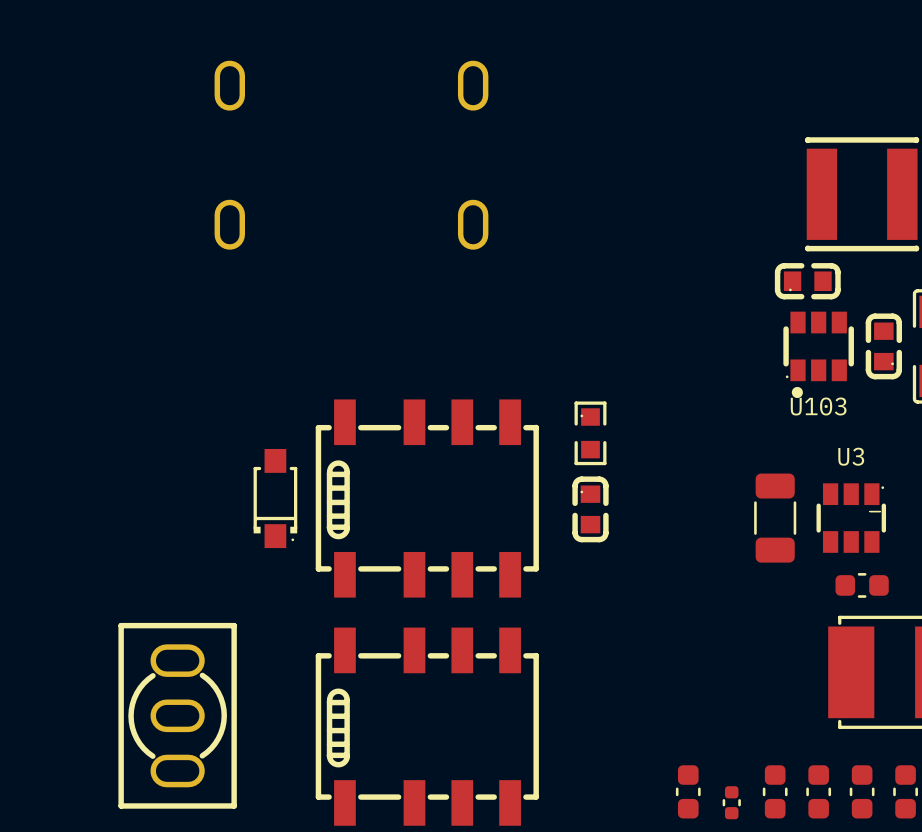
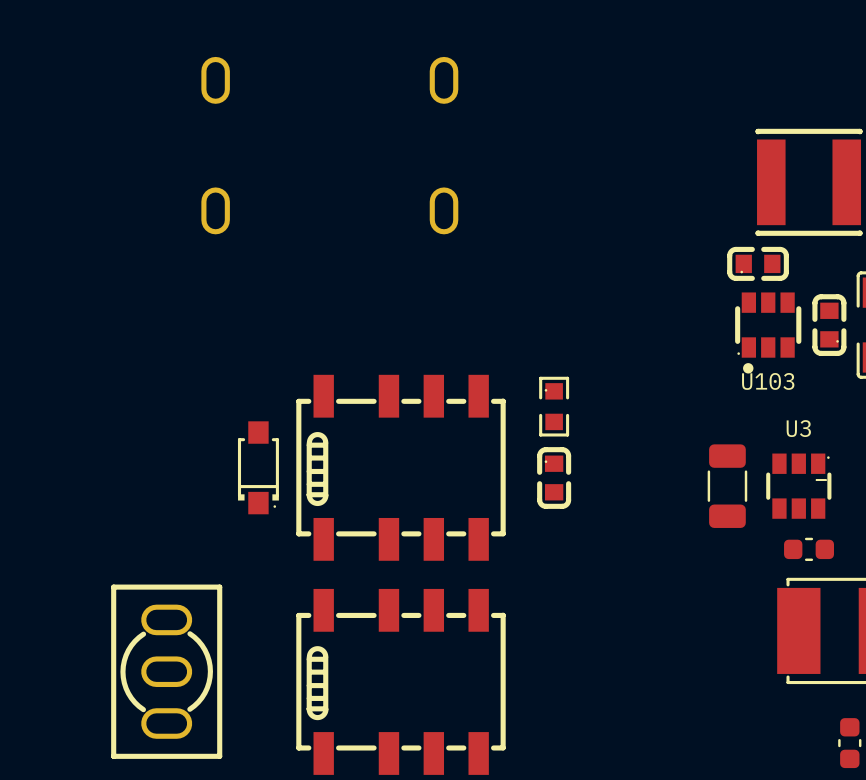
part: (688, 791) -> none
part: (775, 791) -> none
part: (818, 791) -> none
part: (862, 791) -> none
part: (731, 802) -> none

